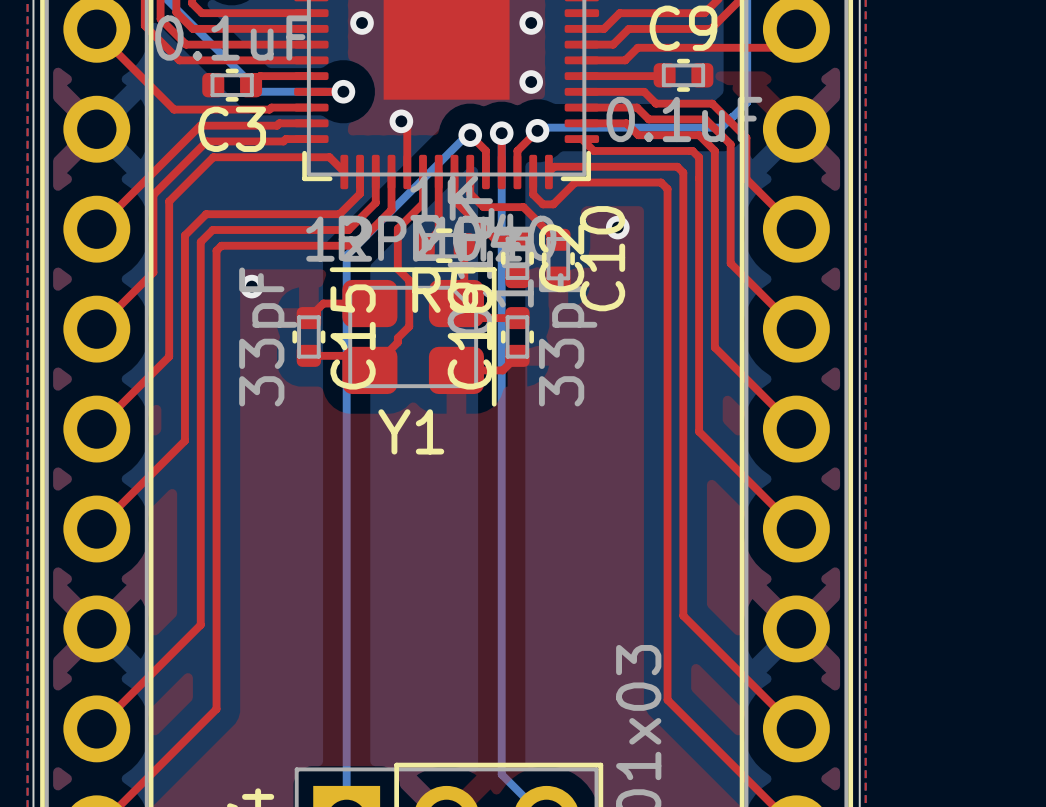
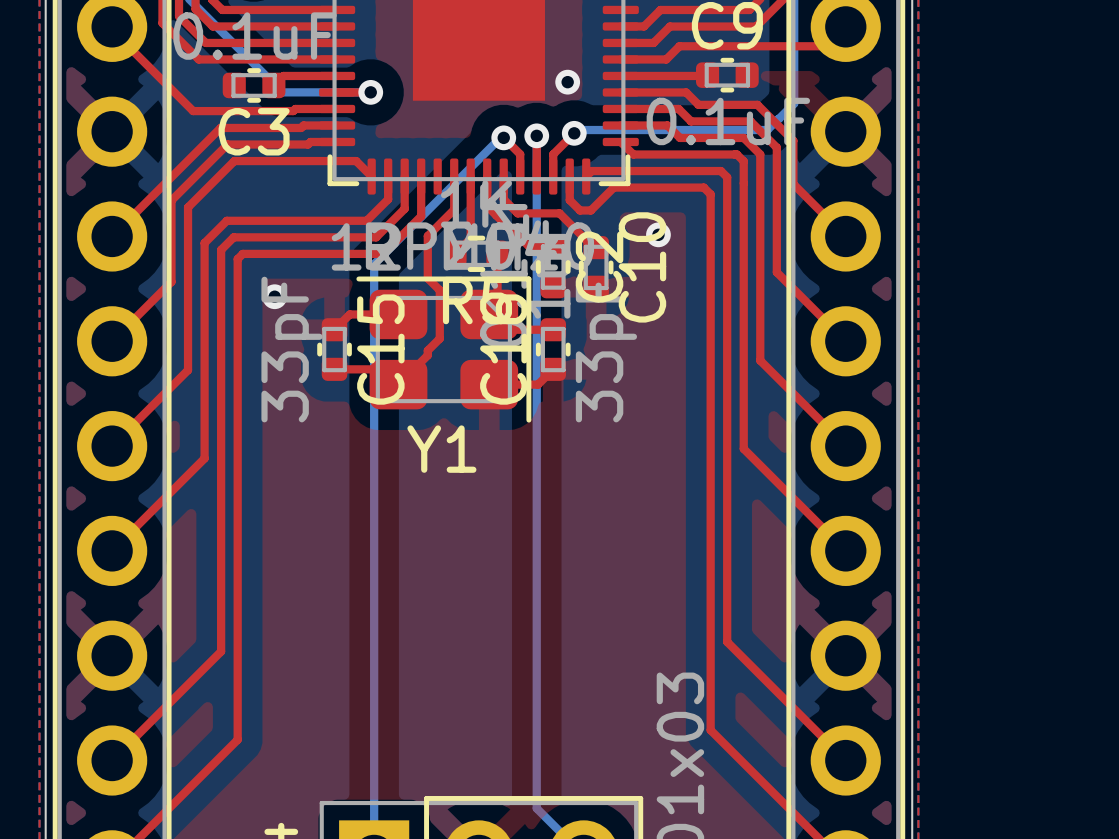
via: (362, 22) -> none
via: (531, 22) -> none
top track: (401, 121) (407, 127) (407, 172) -> none
via: (401, 121) -> none

